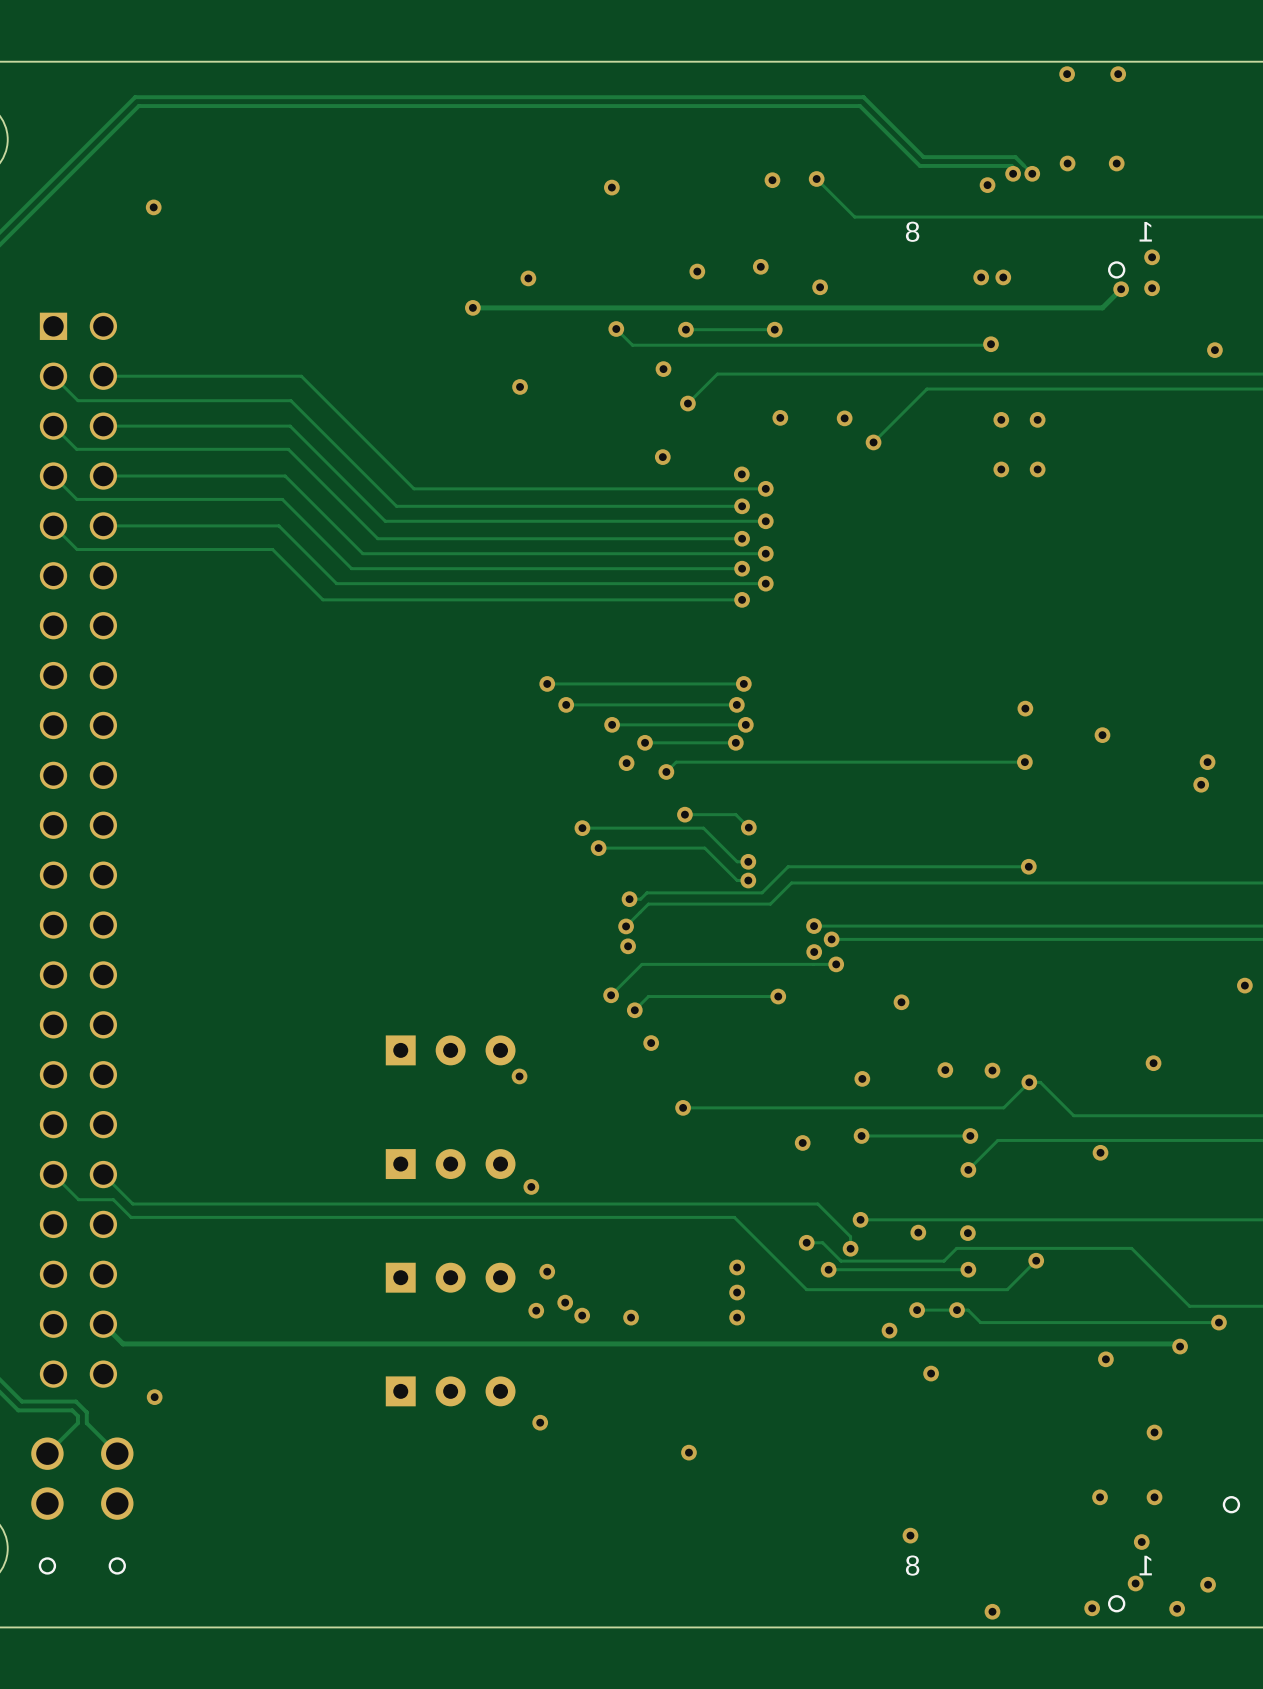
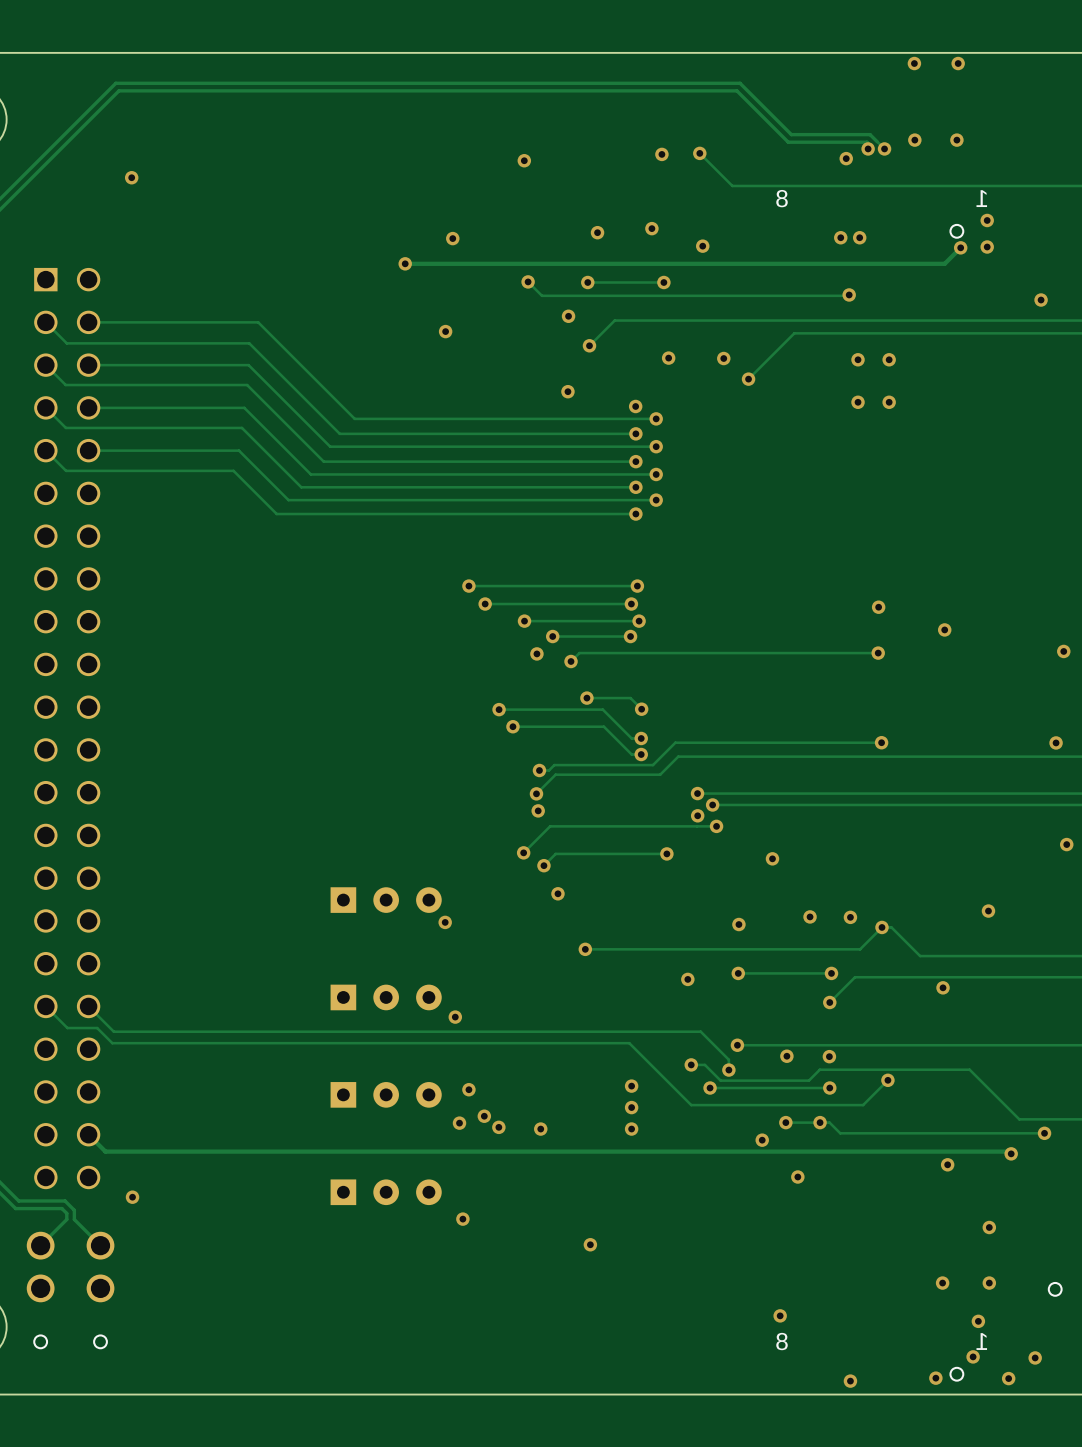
via: none -> (1063, 651)
via: (1207, 762) -> none
via: (1201, 784) -> none
via: none -> (1056, 742)

